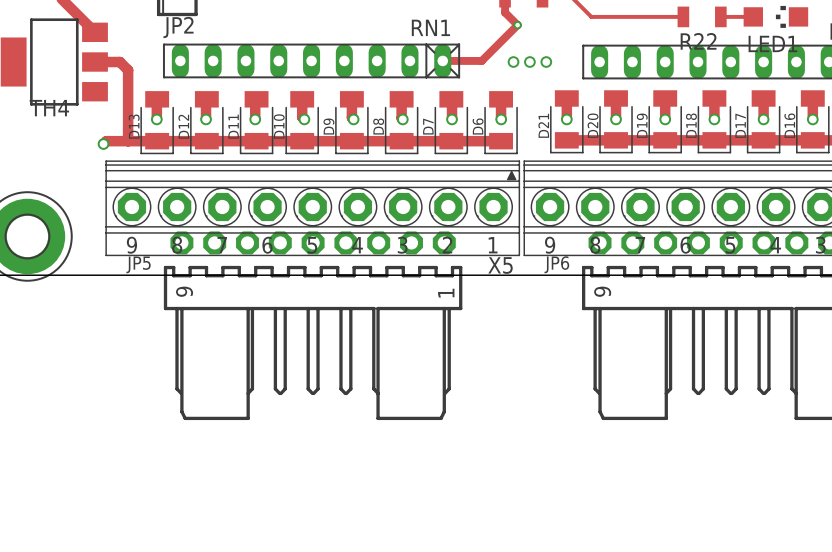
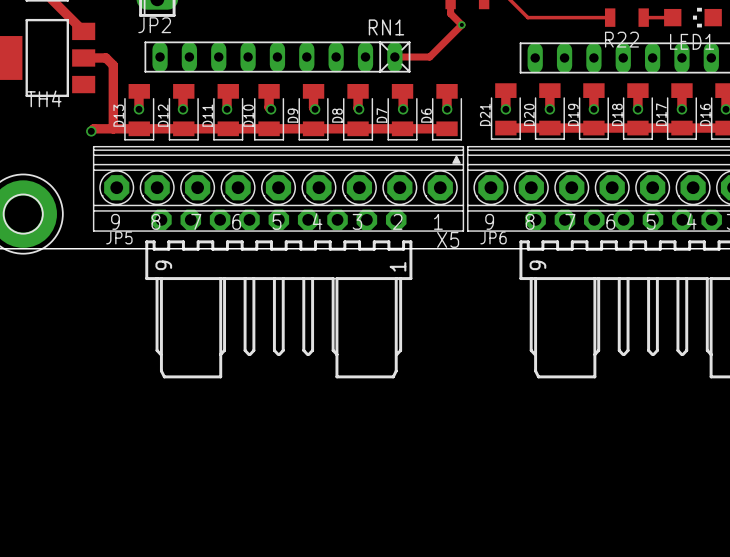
via: (513, 62) -> none
via: (529, 62) -> none
via: (546, 62) -> none

